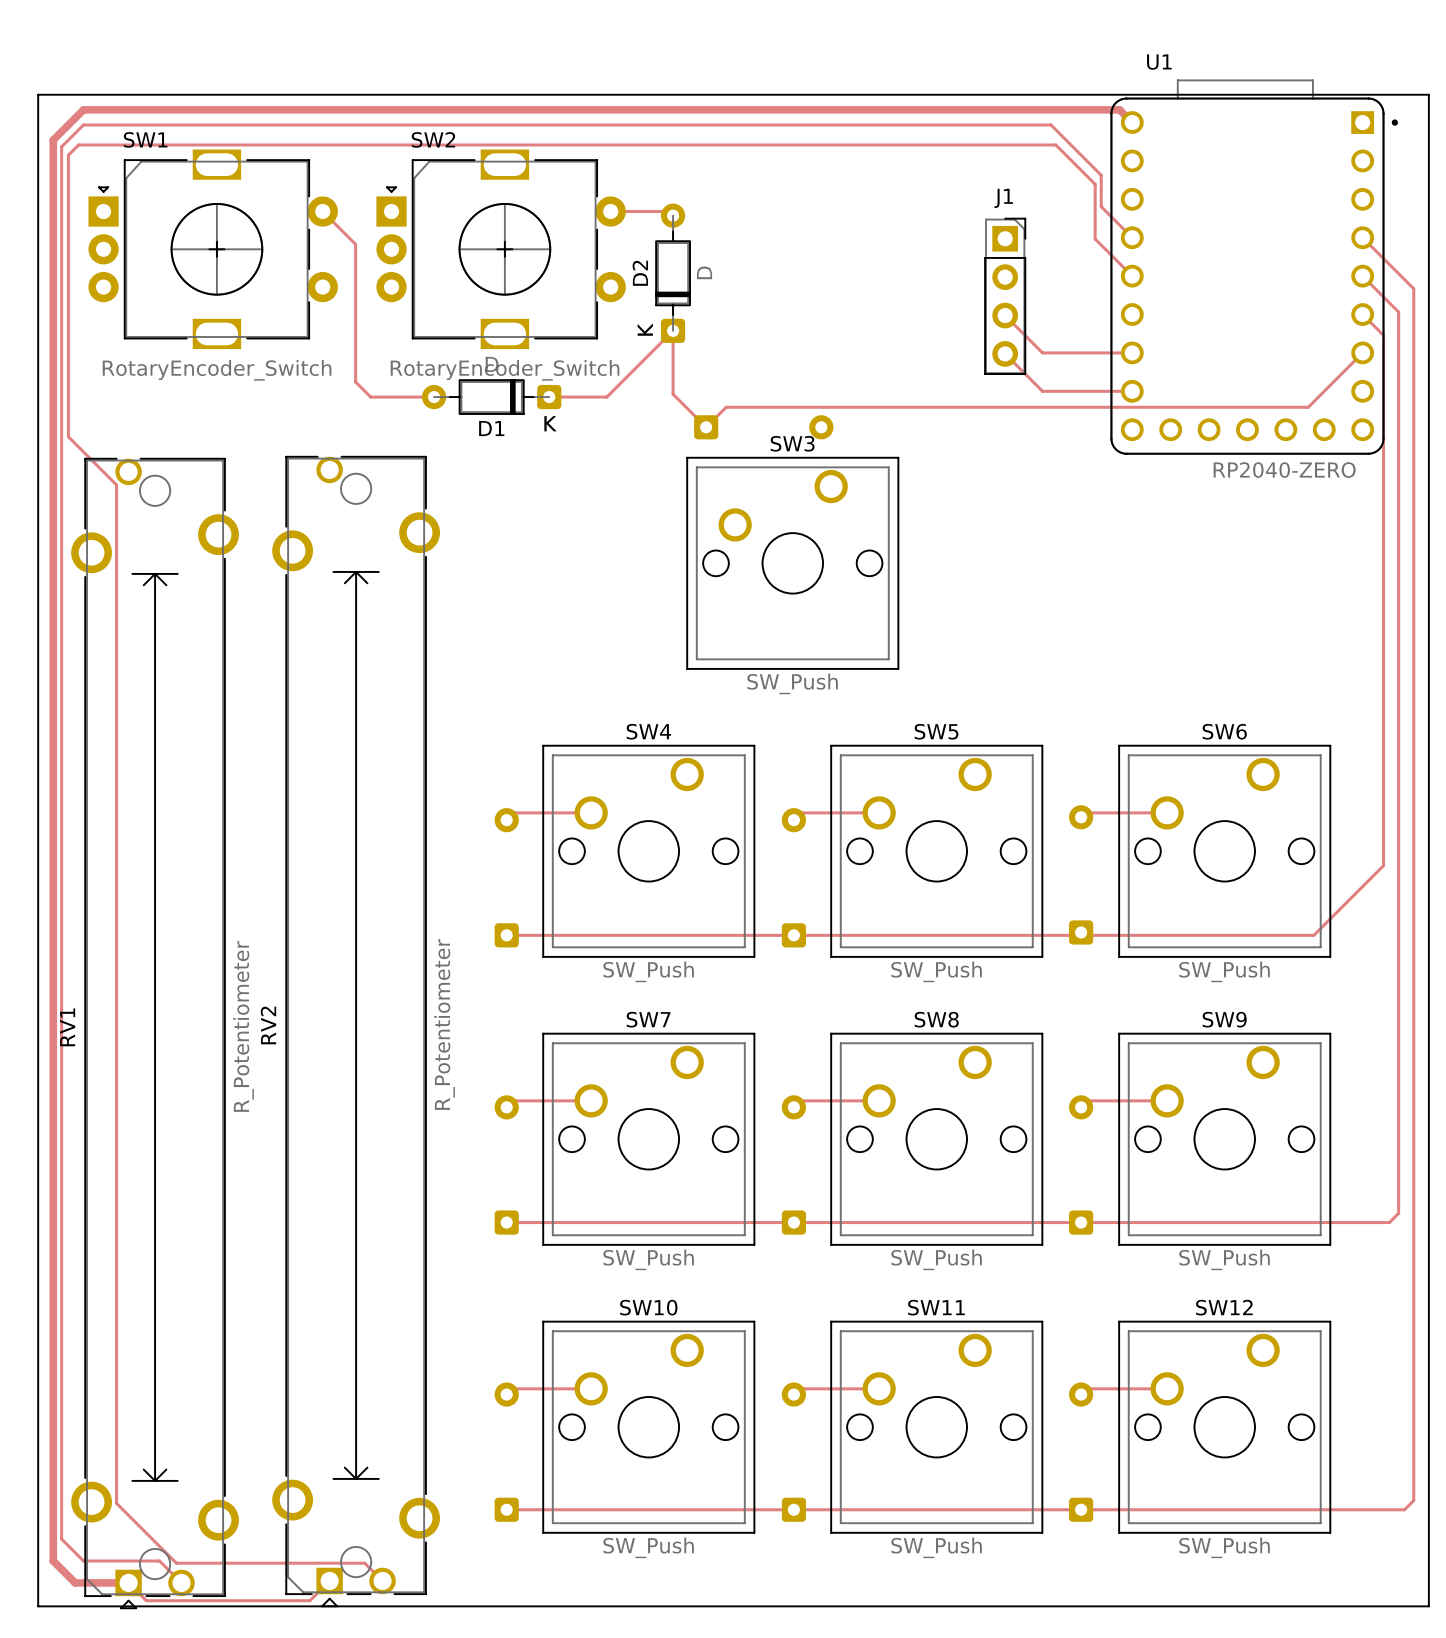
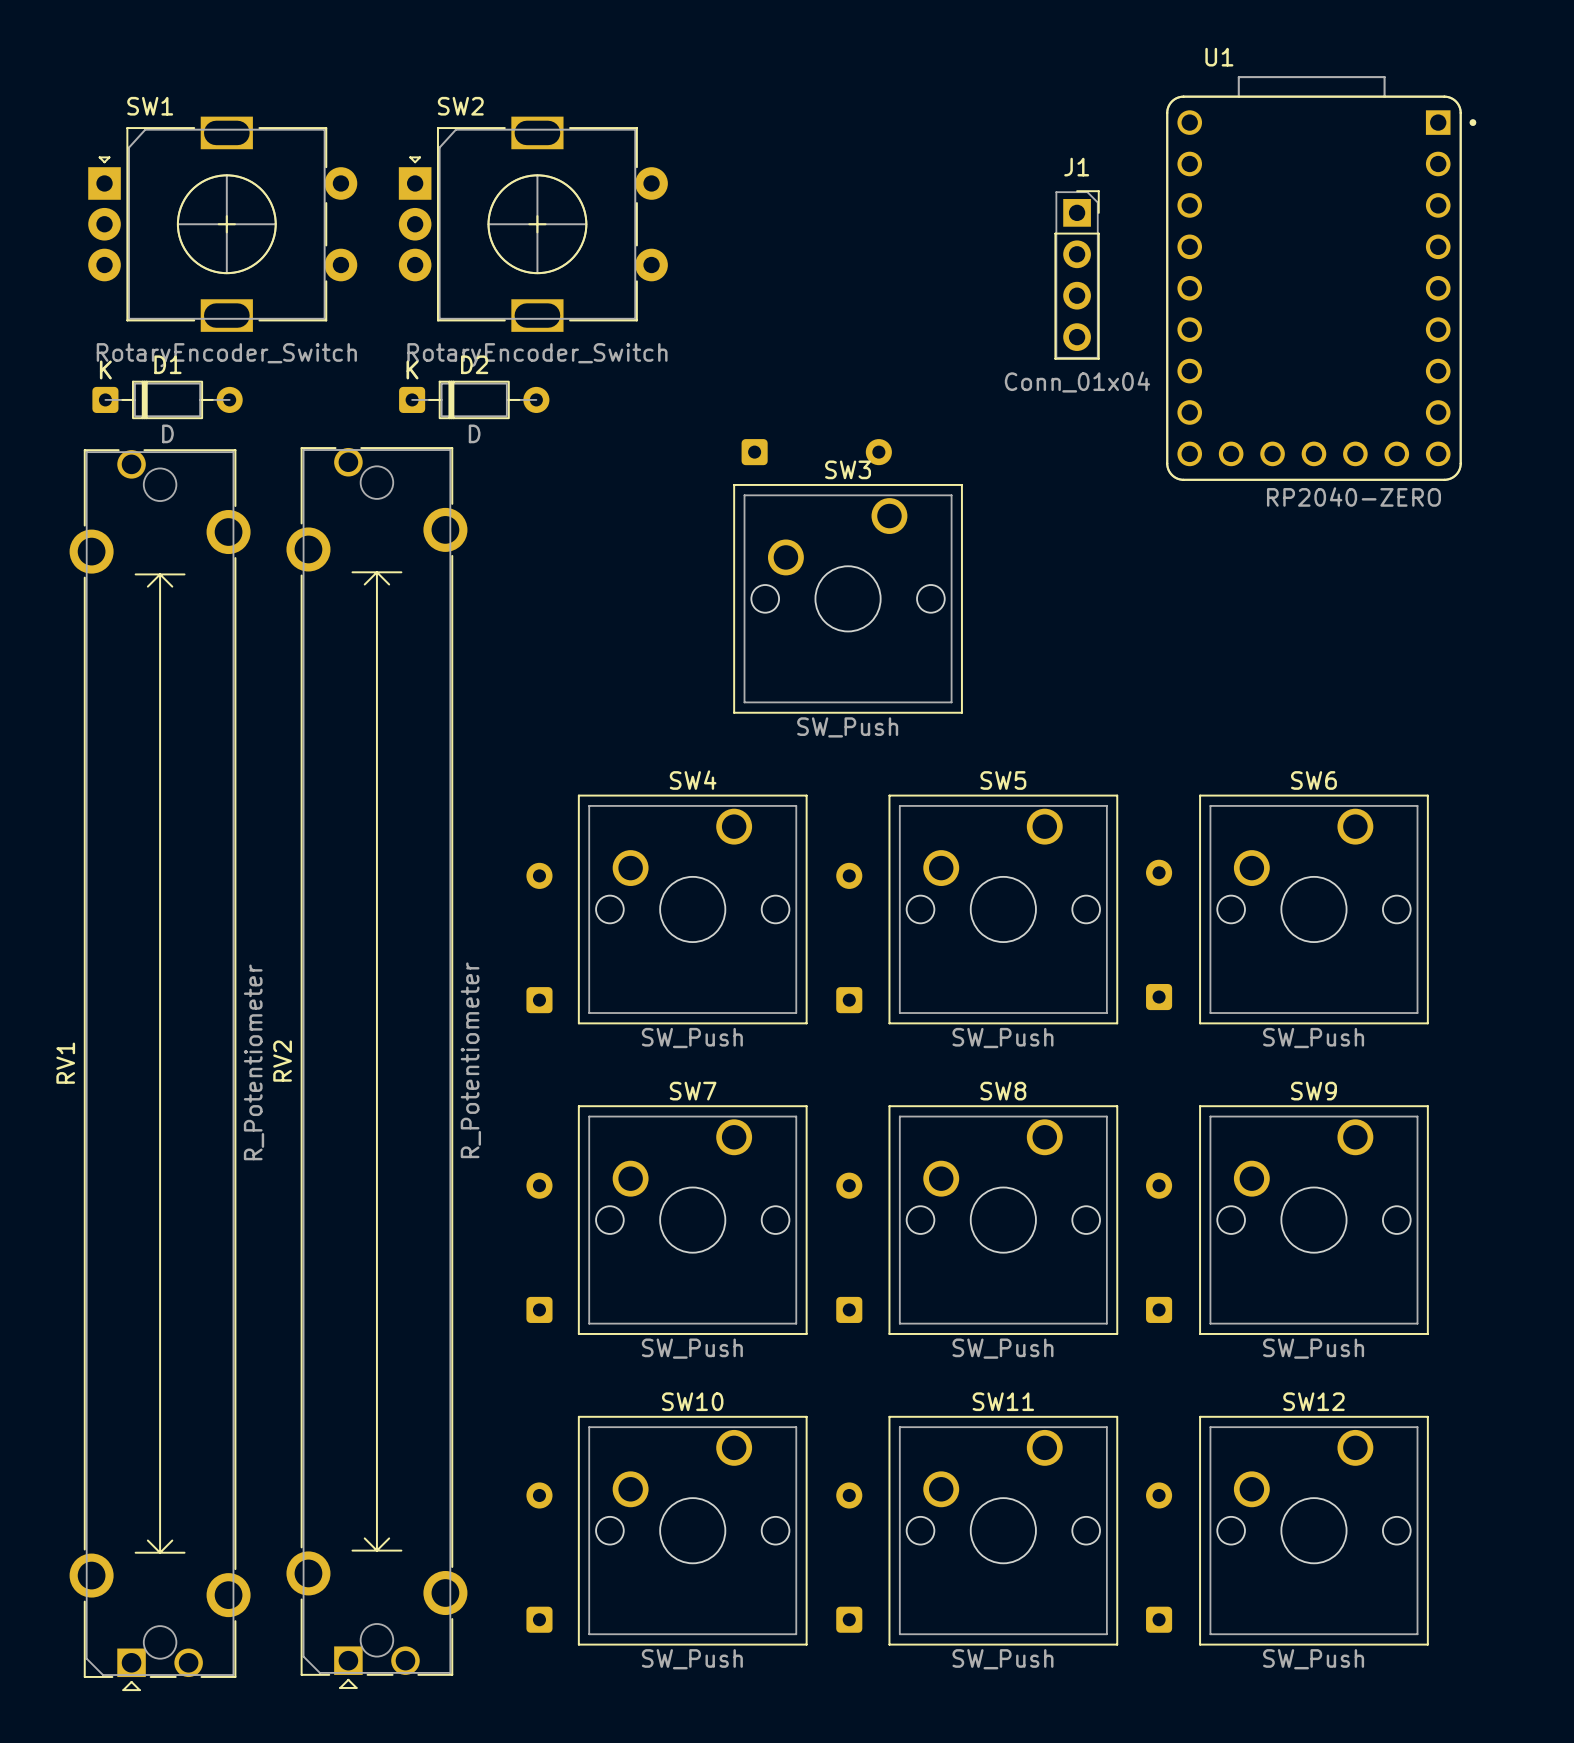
board edge: (38, 94) (1428, 94) (1428, 1606) (38, 1606) (38, 94) -> none
track: (1132, 122) (1119, 109) (83, 109) (53, 140) (53, 1561) (75, 1582) (128, 1582) (146, 1600) (309, 1600) (329, 1580) -> none
track: (322, 211) (355, 244) (355, 381) (370, 397) (434, 397) -> none
track: (610, 211) (668, 211) (673, 215) -> none
track: (1132, 237) (1101, 206) (1101, 175) (1050, 124) (83, 124) (61, 146) (61, 1539) (83, 1561) (159, 1561) (181, 1582) -> none
track: (1362, 237) (1413, 288) (1413, 1500) (1404, 1509) (506, 1509) -> none
SW1 position: (213, 249) -> (222, 224)
SW2 position: (501, 249) -> (533, 224)
U1 position: (1254, 267) -> (1321, 278)
D2 rotation: 0° (673, 273) -> 90° clockwise (474, 399)
D2 position: (673, 273) -> (474, 399)
track: (1132, 276) (1095, 239) (1095, 184) (1055, 144) (78, 144) (68, 155) (68, 436) (116, 484) (116, 1503) (176, 1563) (364, 1563) (382, 1580) -> none
track: (1362, 276) (1398, 312) (1398, 1213) (1389, 1222) (506, 1222) -> none
J1 position: (1005, 296) -> (1077, 274)
track: (1362, 314) (1383, 335) (1383, 865) (1313, 935) (506, 935) -> none
track: (1005, 315) (1042, 352) (1132, 352) -> none
track: (1362, 352) (1308, 407) (726, 407) (706, 427) -> none
track: (1005, 353) (1042, 391) (1132, 391) -> none
J1 value: none -> Conn_01x04 (1077, 382)
D1 rotation: 0° (491, 397) -> 180° (167, 399)
D1 position: (491, 397) -> (167, 399)
track: (549, 397) (606, 397) (673, 330) (673, 394) (706, 427) -> none
track: (591, 812) (513, 812) (506, 820) -> none
track: (879, 812) (801, 812) (793, 820) -> none
track: (1167, 812) (1085, 812) (1081, 817) -> none
RV2 position: (356, 1031) -> (376, 1068)
RV1 position: (155, 1033) -> (160, 1070)
track: (591, 1100) (513, 1100) (506, 1107) -> none
track: (879, 1100) (800, 1100) (793, 1107) -> none
track: (1167, 1100) (1087, 1100) (1081, 1107) -> none
track: (591, 1388) (512, 1388) (506, 1394) -> none
track: (879, 1388) (799, 1388) (793, 1394) -> none
track: (1167, 1388) (1086, 1388) (1081, 1394) -> none

